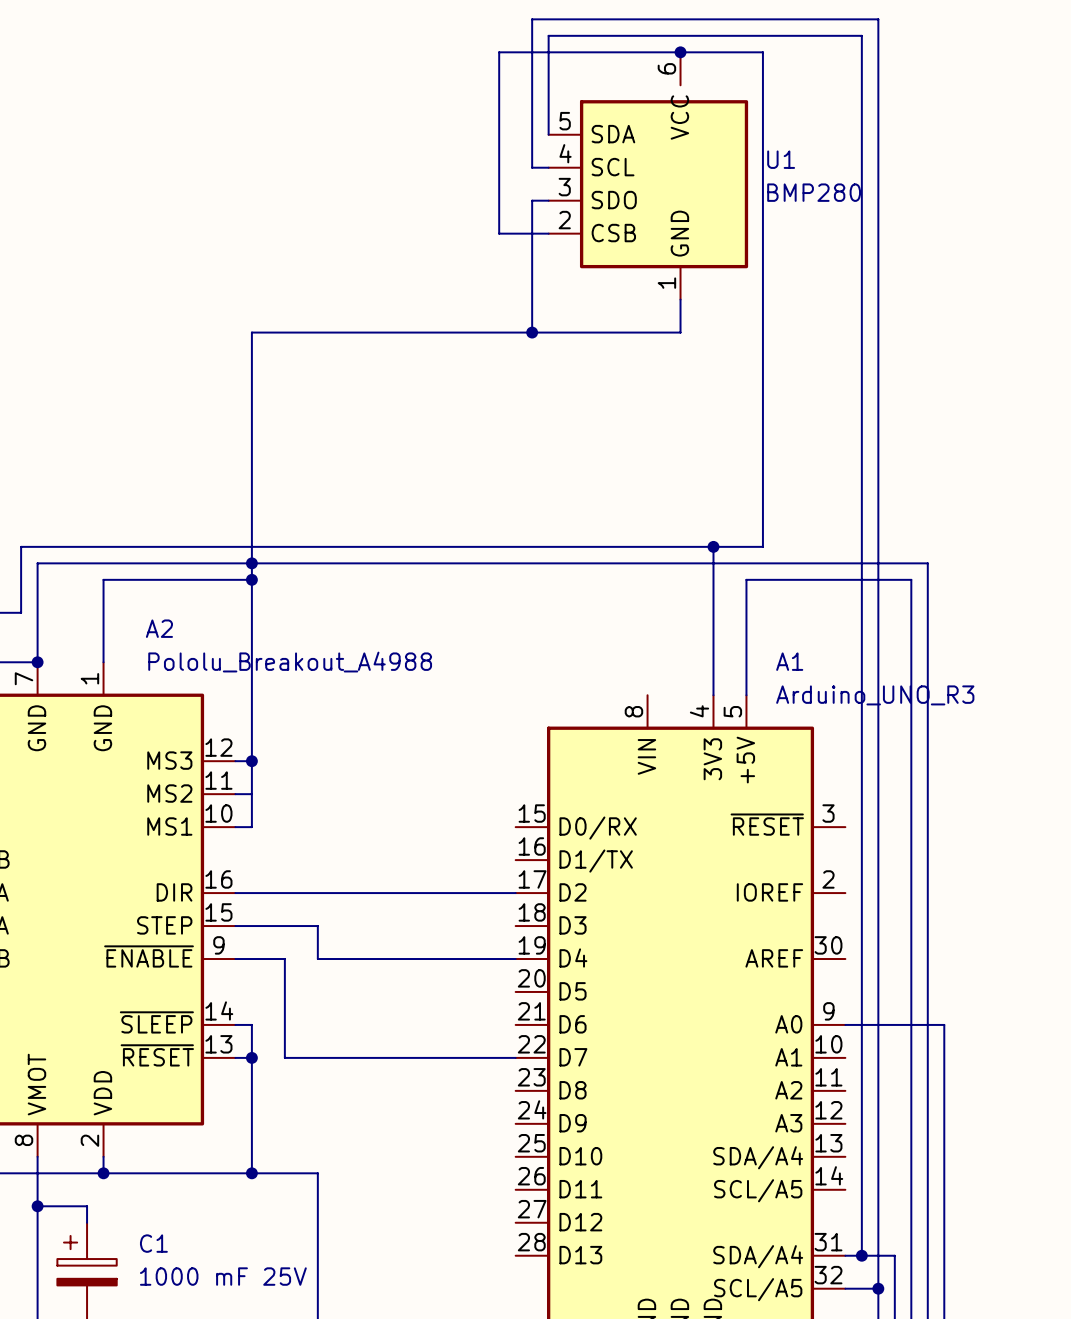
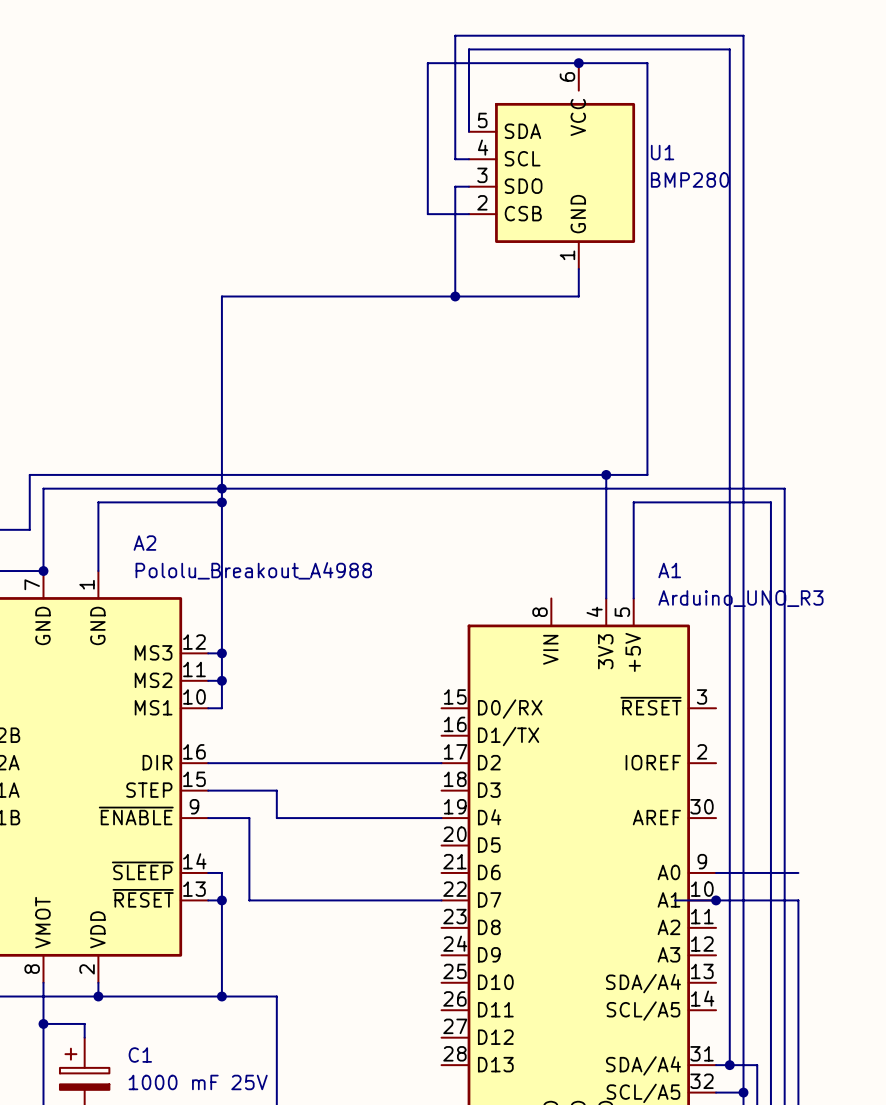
junction: none -> (221, 680)
wire: (944, 1024) (944, 1057) -> (674, 900) (798, 900)
junction: none -> (716, 900)

